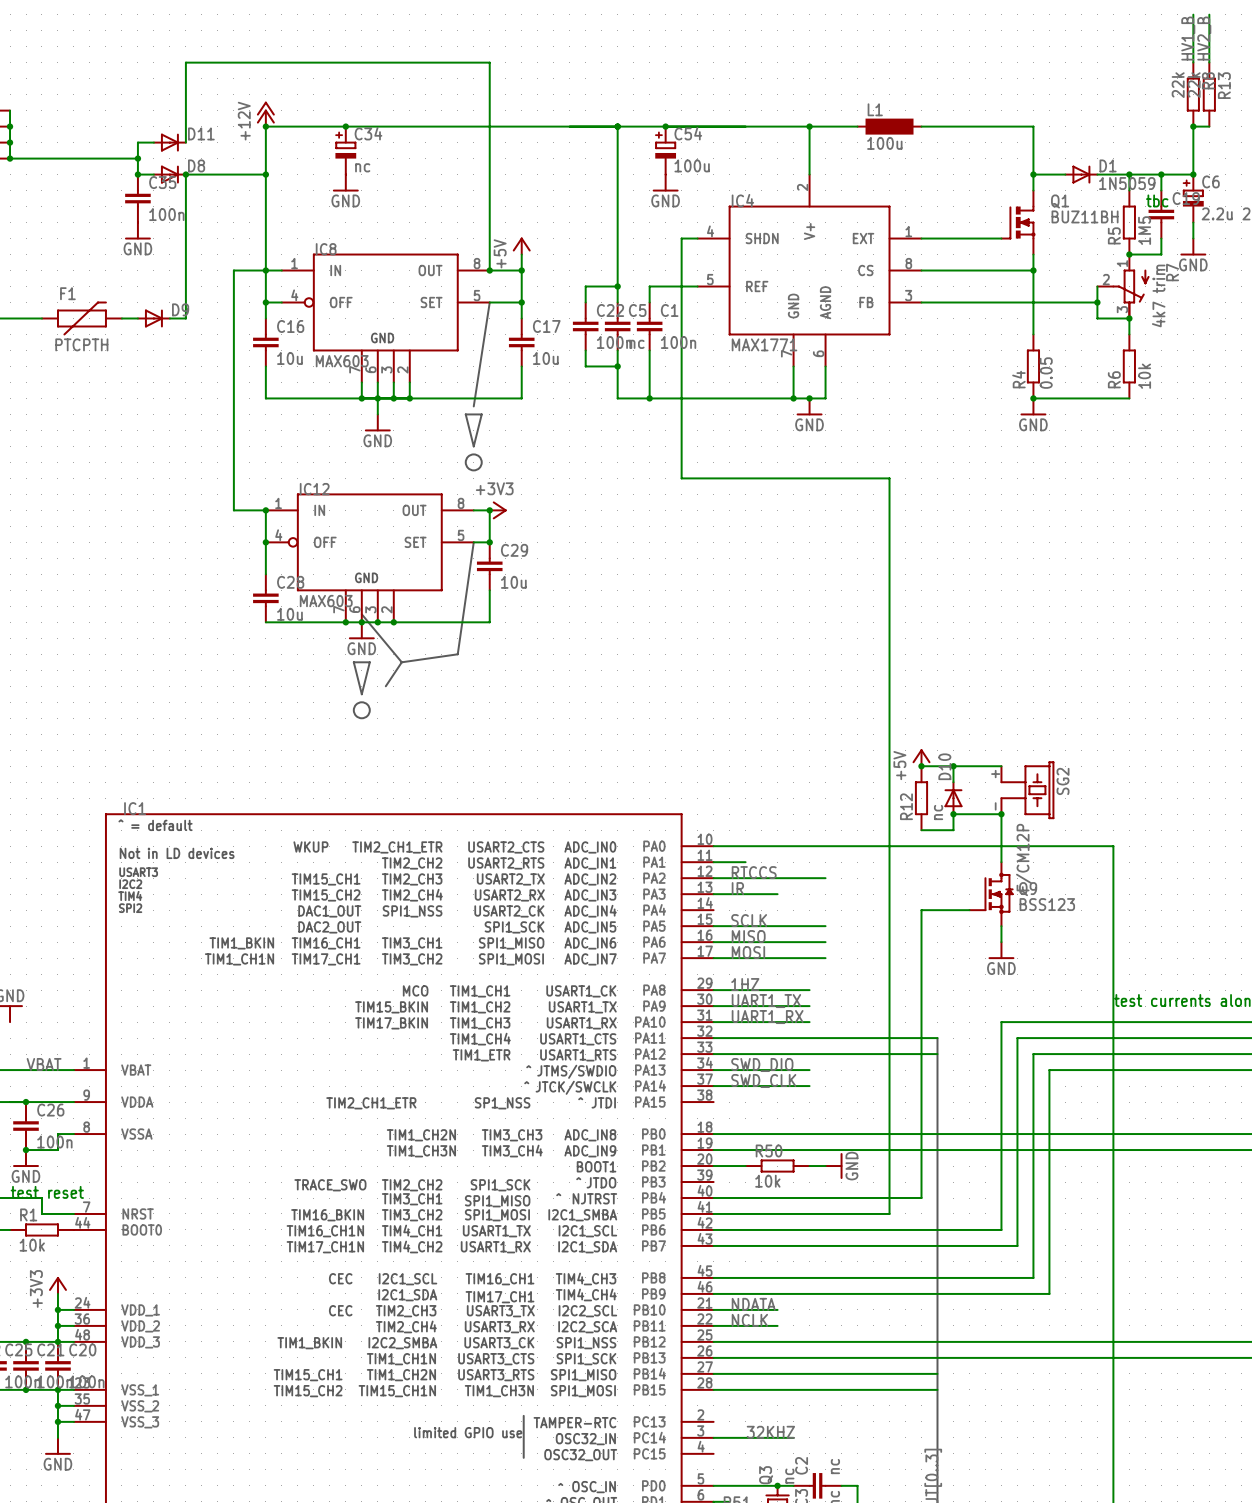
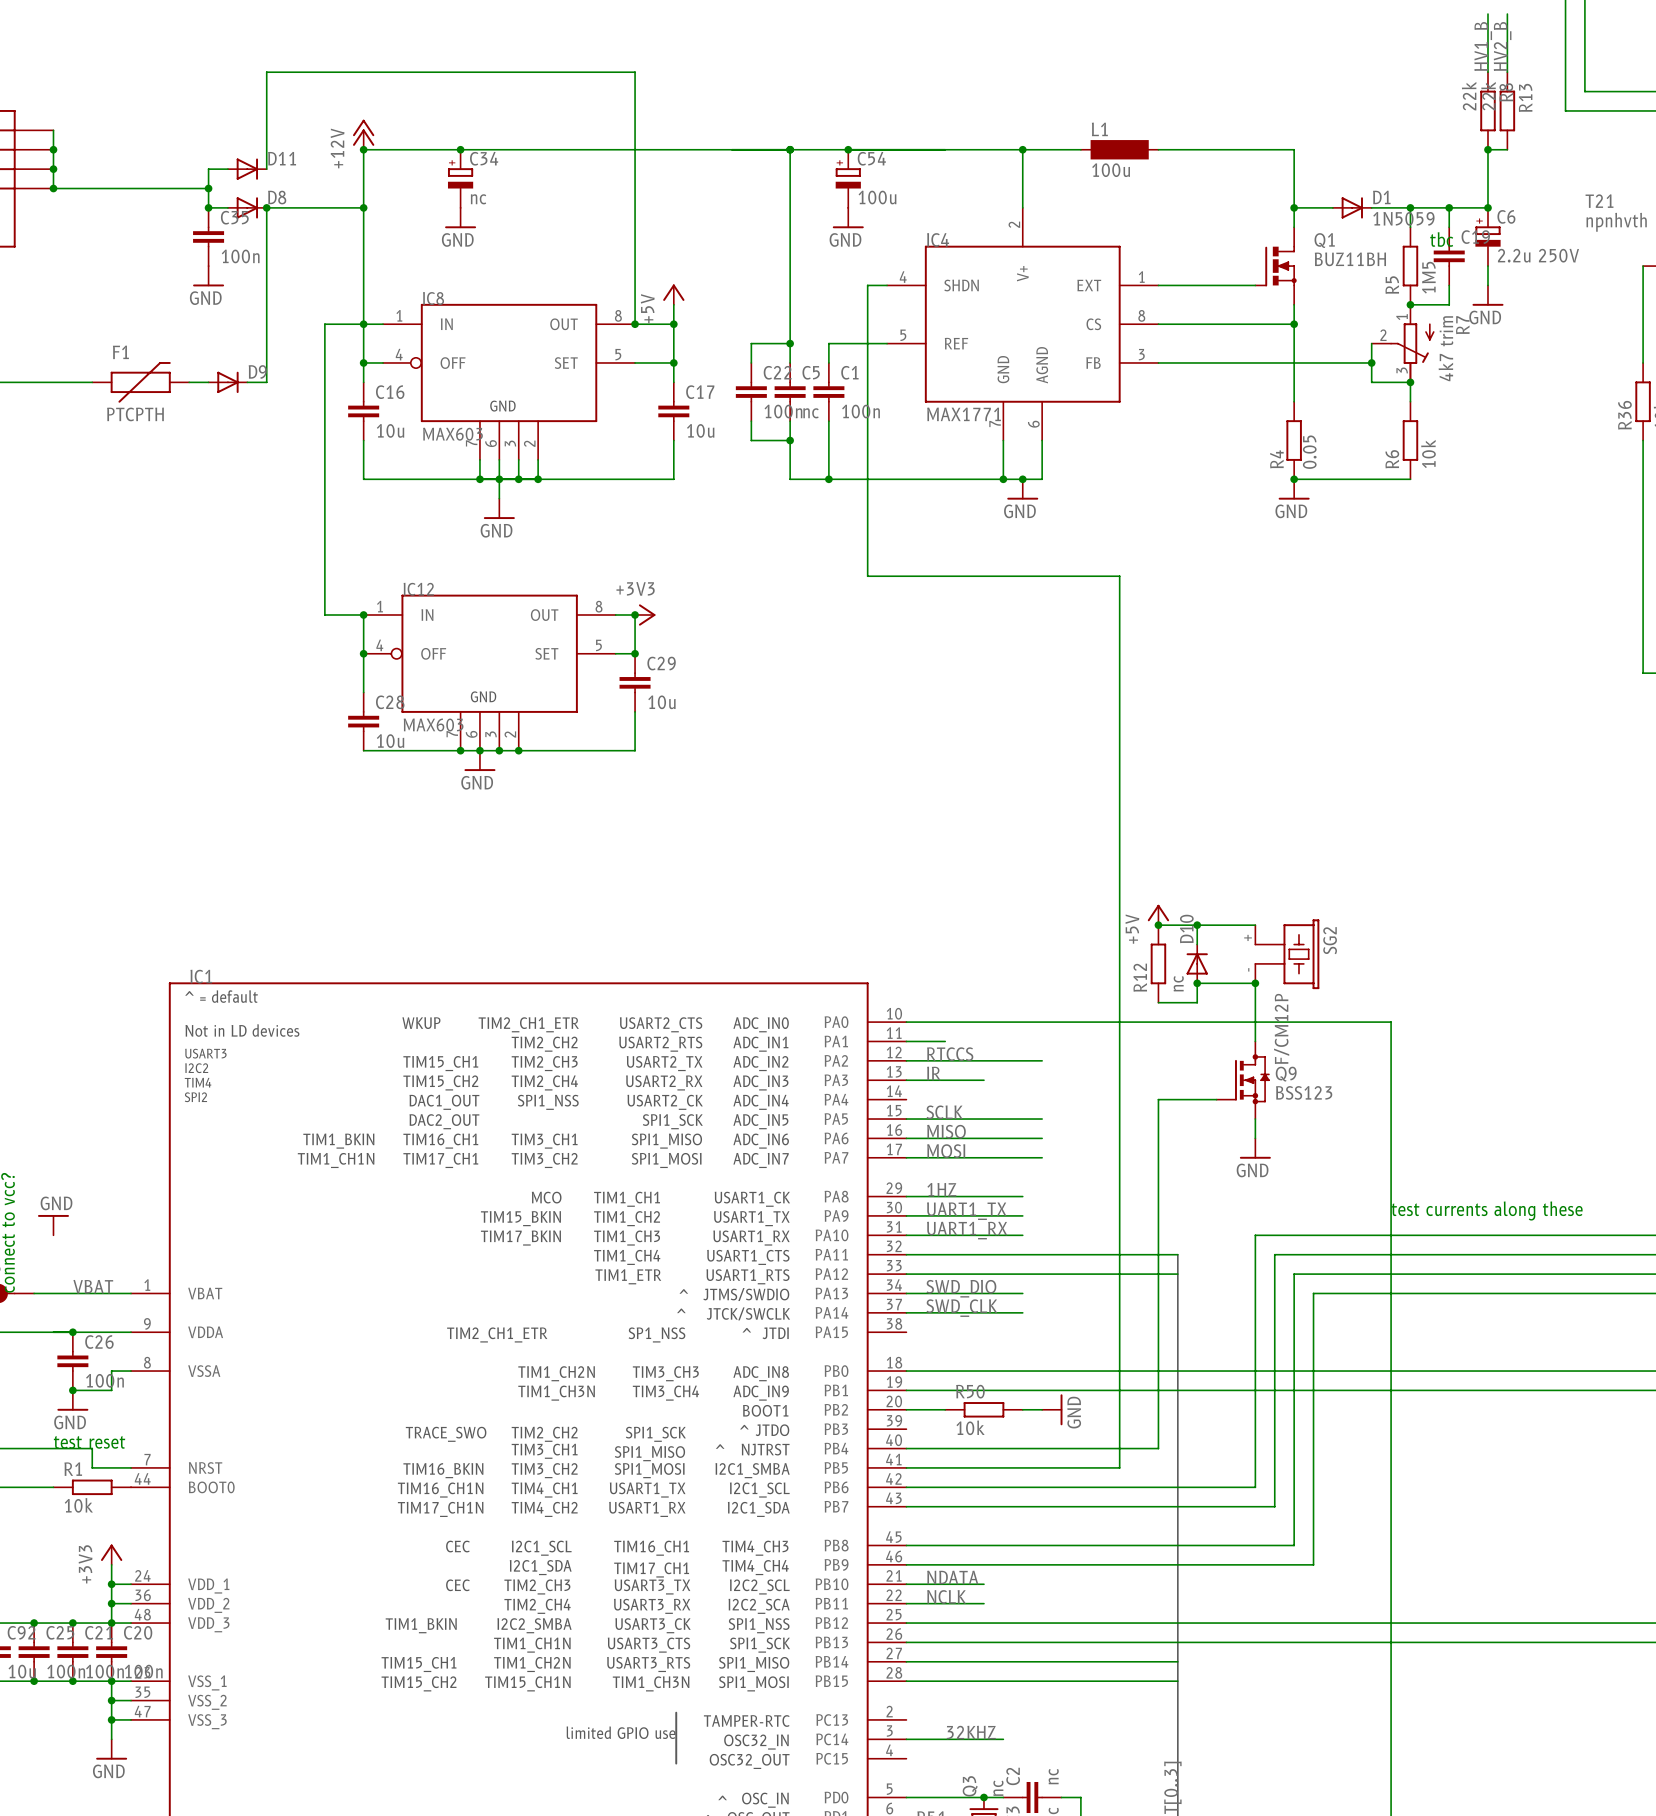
line: (489, 302) (473, 406) -> none
line: (465, 414) (481, 414) (473, 446) (465, 414) -> none
drawing: [465, 453, 483, 471] -> none
line: (473, 542) (457, 654) (401, 662) -> none
line: (361, 614) (401, 662) -> none
line: (353, 662) (369, 662) (361, 694) (353, 662) -> none
line: (401, 662) (385, 686) -> none
drawing: [353, 701, 371, 719] -> none

